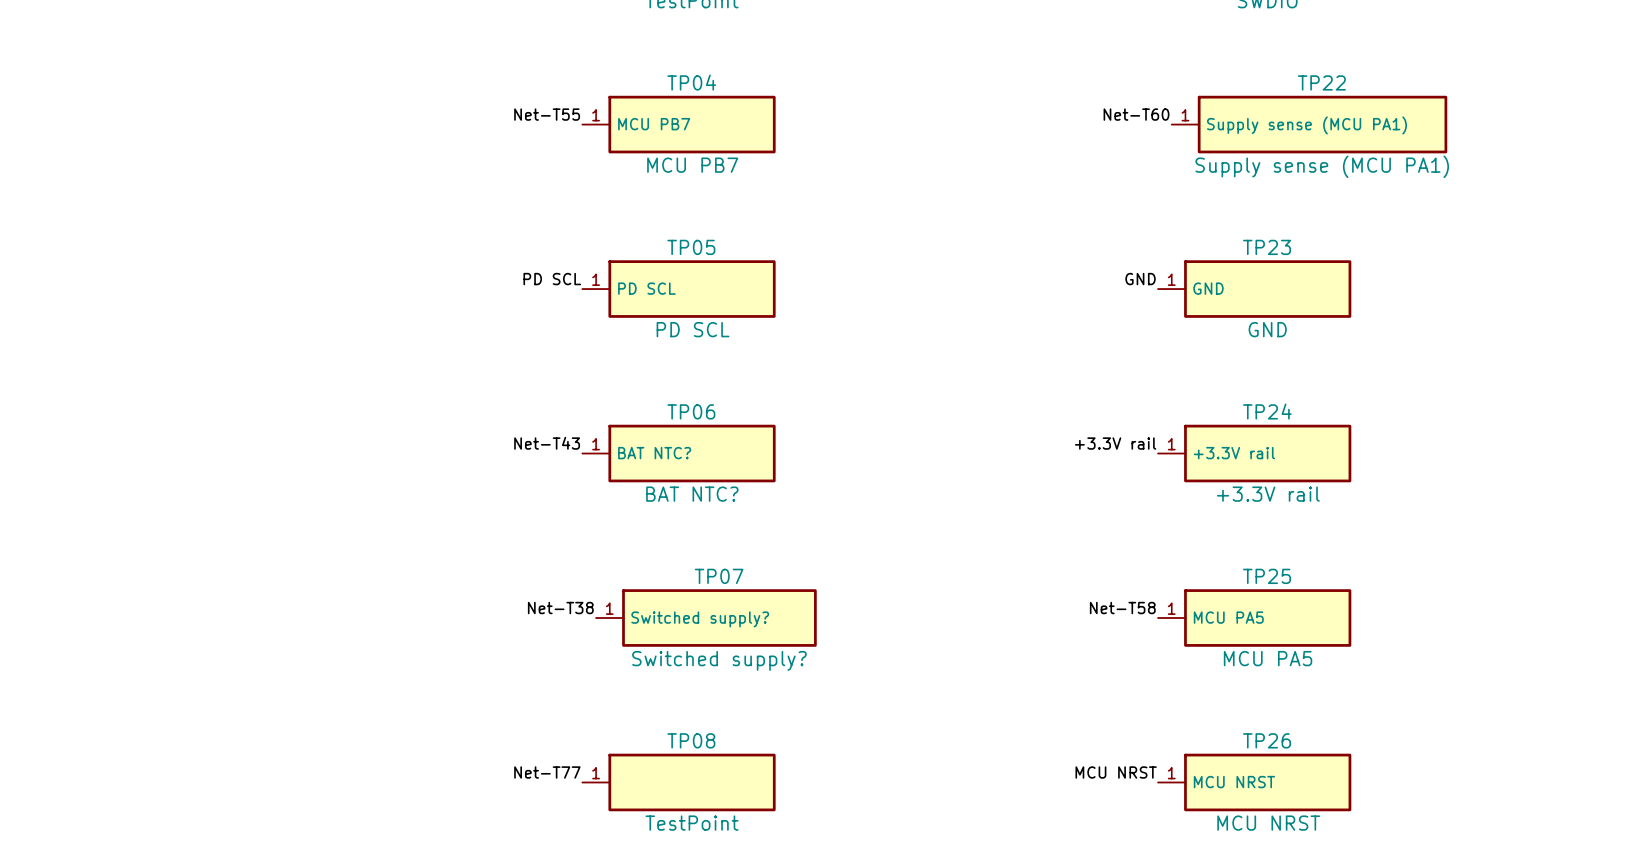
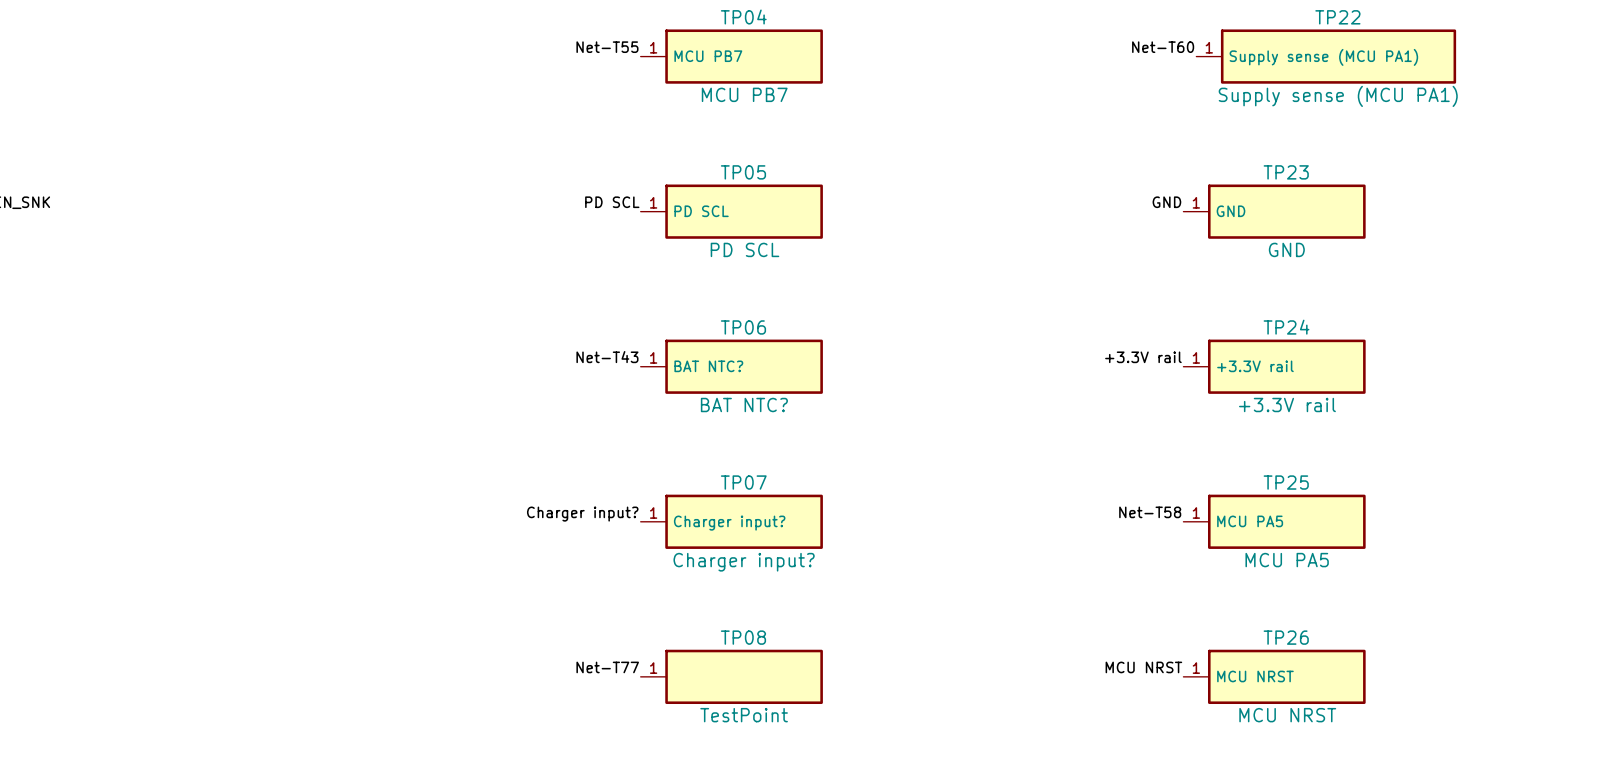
TP07 symbol: [596, 589, 817, 647] -> [640, 494, 823, 549]
label: Net-T38 (560, 608) -> none
label: none -> Charger input? (582, 514)
TP07 value: Switched supply? (719, 660) -> Charger input? (744, 562)

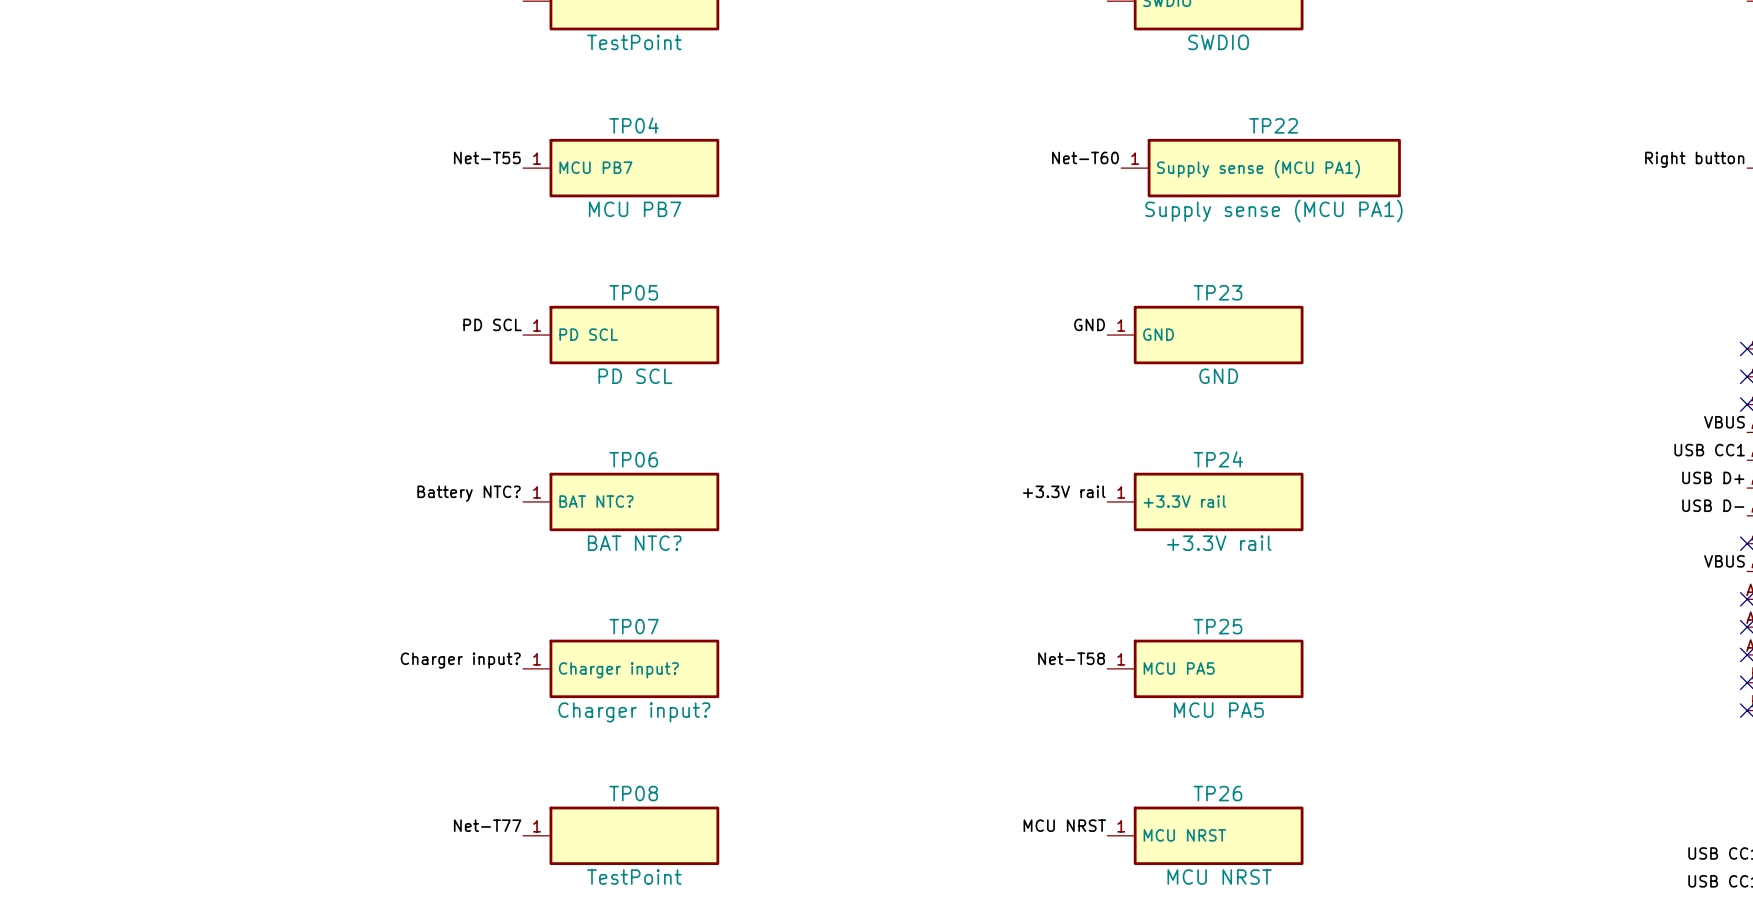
label: Net-T43 (607, 357) -> Battery NTC? (469, 493)

